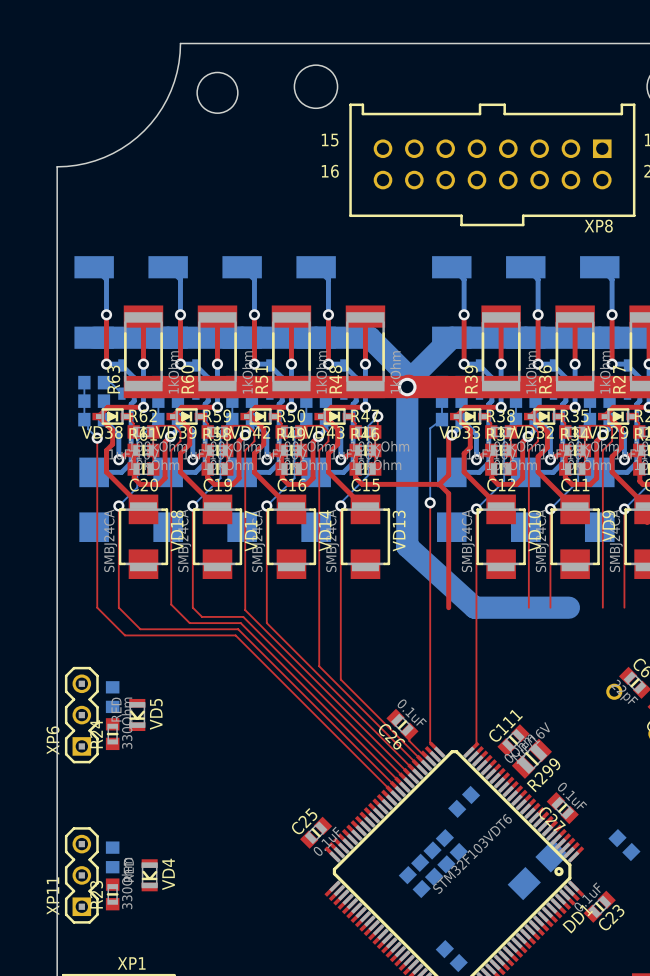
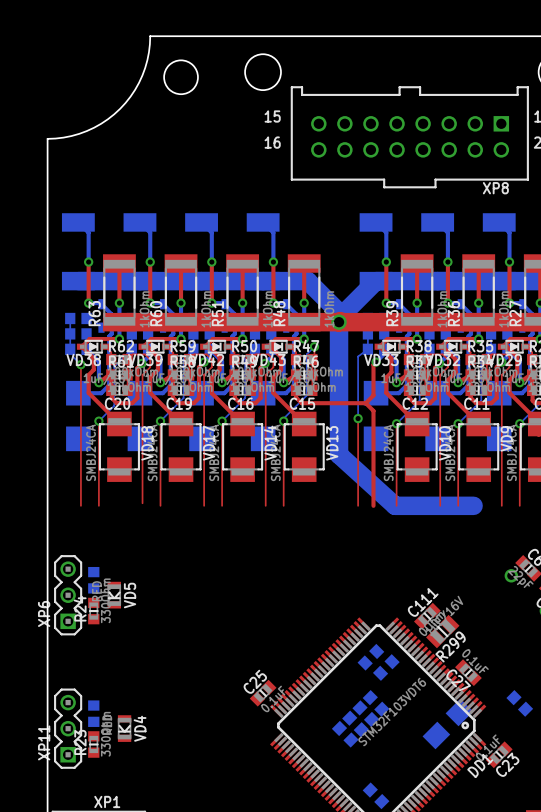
top track: (171, 604) (189, 623) (240, 623) (402, 784) -> none
top track: (97, 607) (124, 635) (235, 635) (393, 793) -> none
top track: (118, 607) (140, 629) (238, 629) (397, 788) -> none
top track: (192, 607) (202, 616) (243, 616) (406, 780) -> none
top track: (245, 607) (245, 610) (410, 775) -> none
top track: (266, 607) (266, 623) (414, 771) -> none
top track: (319, 607) (319, 666) (419, 766) -> none
top track: (340, 607) (340, 679) (423, 762) -> none
top track: (430, 607) (430, 742) (436, 749) -> none
top track: (476, 607) (476, 744) (471, 749) -> none
C26 side: top (402, 724) -> bottom (370, 657)
top track: (409, 731) (409, 741) (427, 758) -> none

